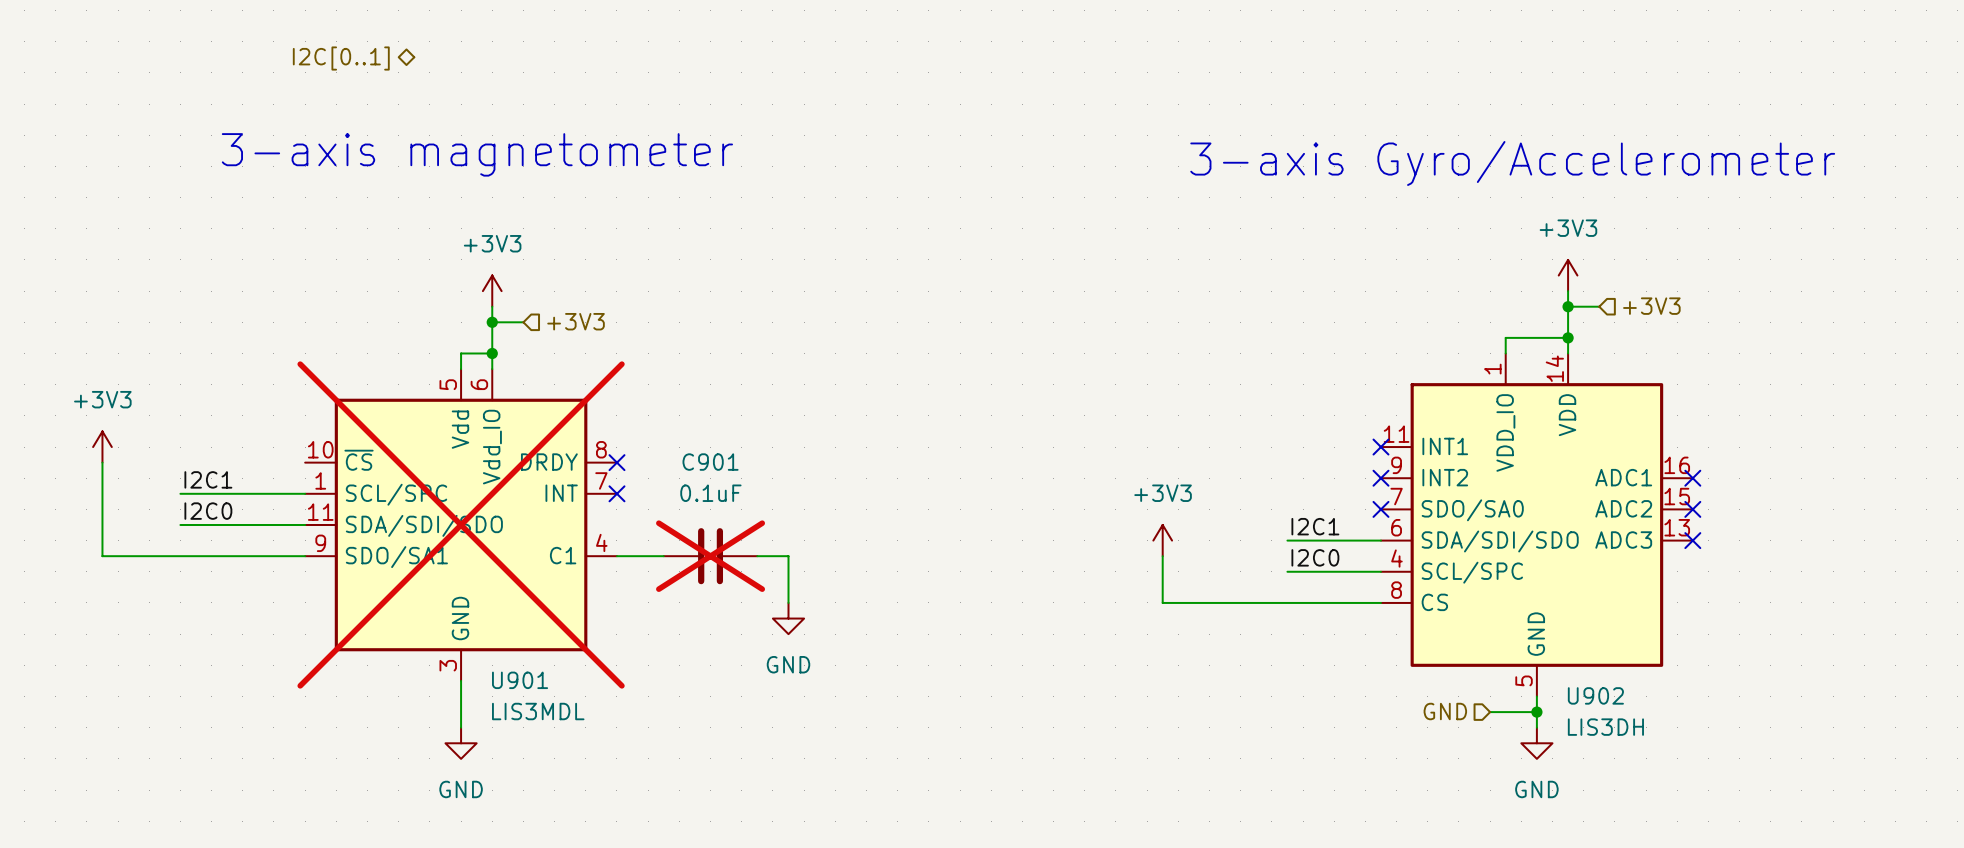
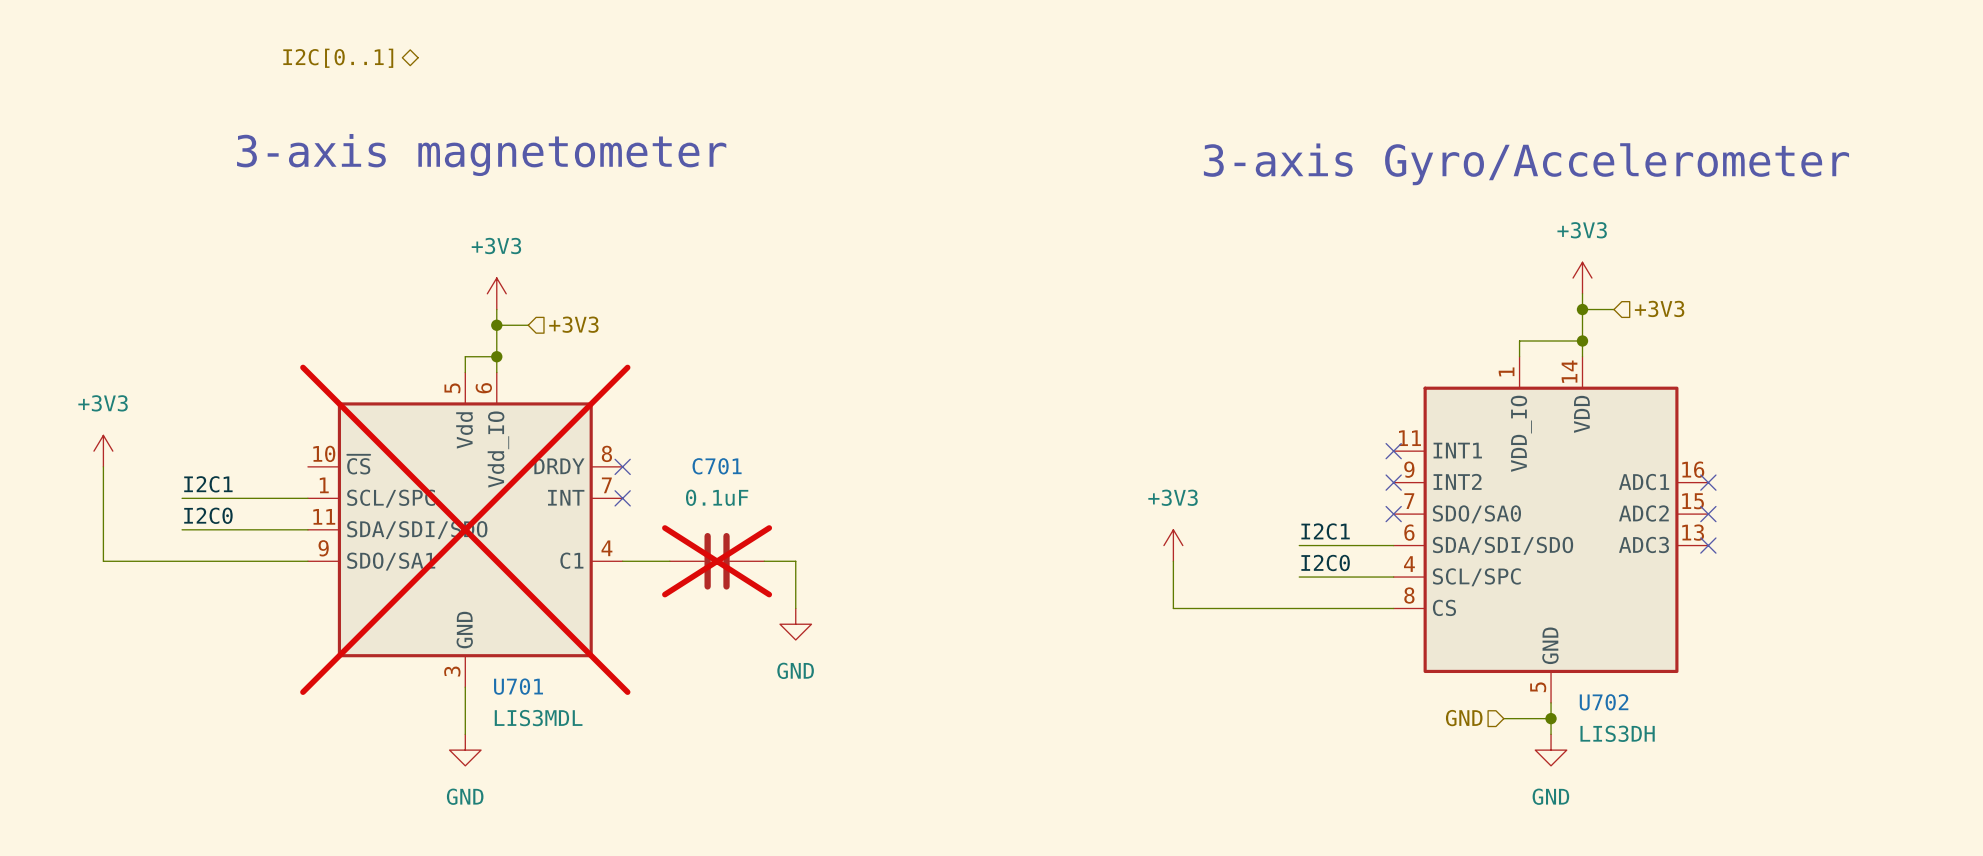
C901 name: C901 (710, 462) -> C701 (717, 466)
U901 name: U901 (520, 680) -> U701 (518, 686)
U902 name: U902 (1595, 695) -> U702 (1604, 702)

